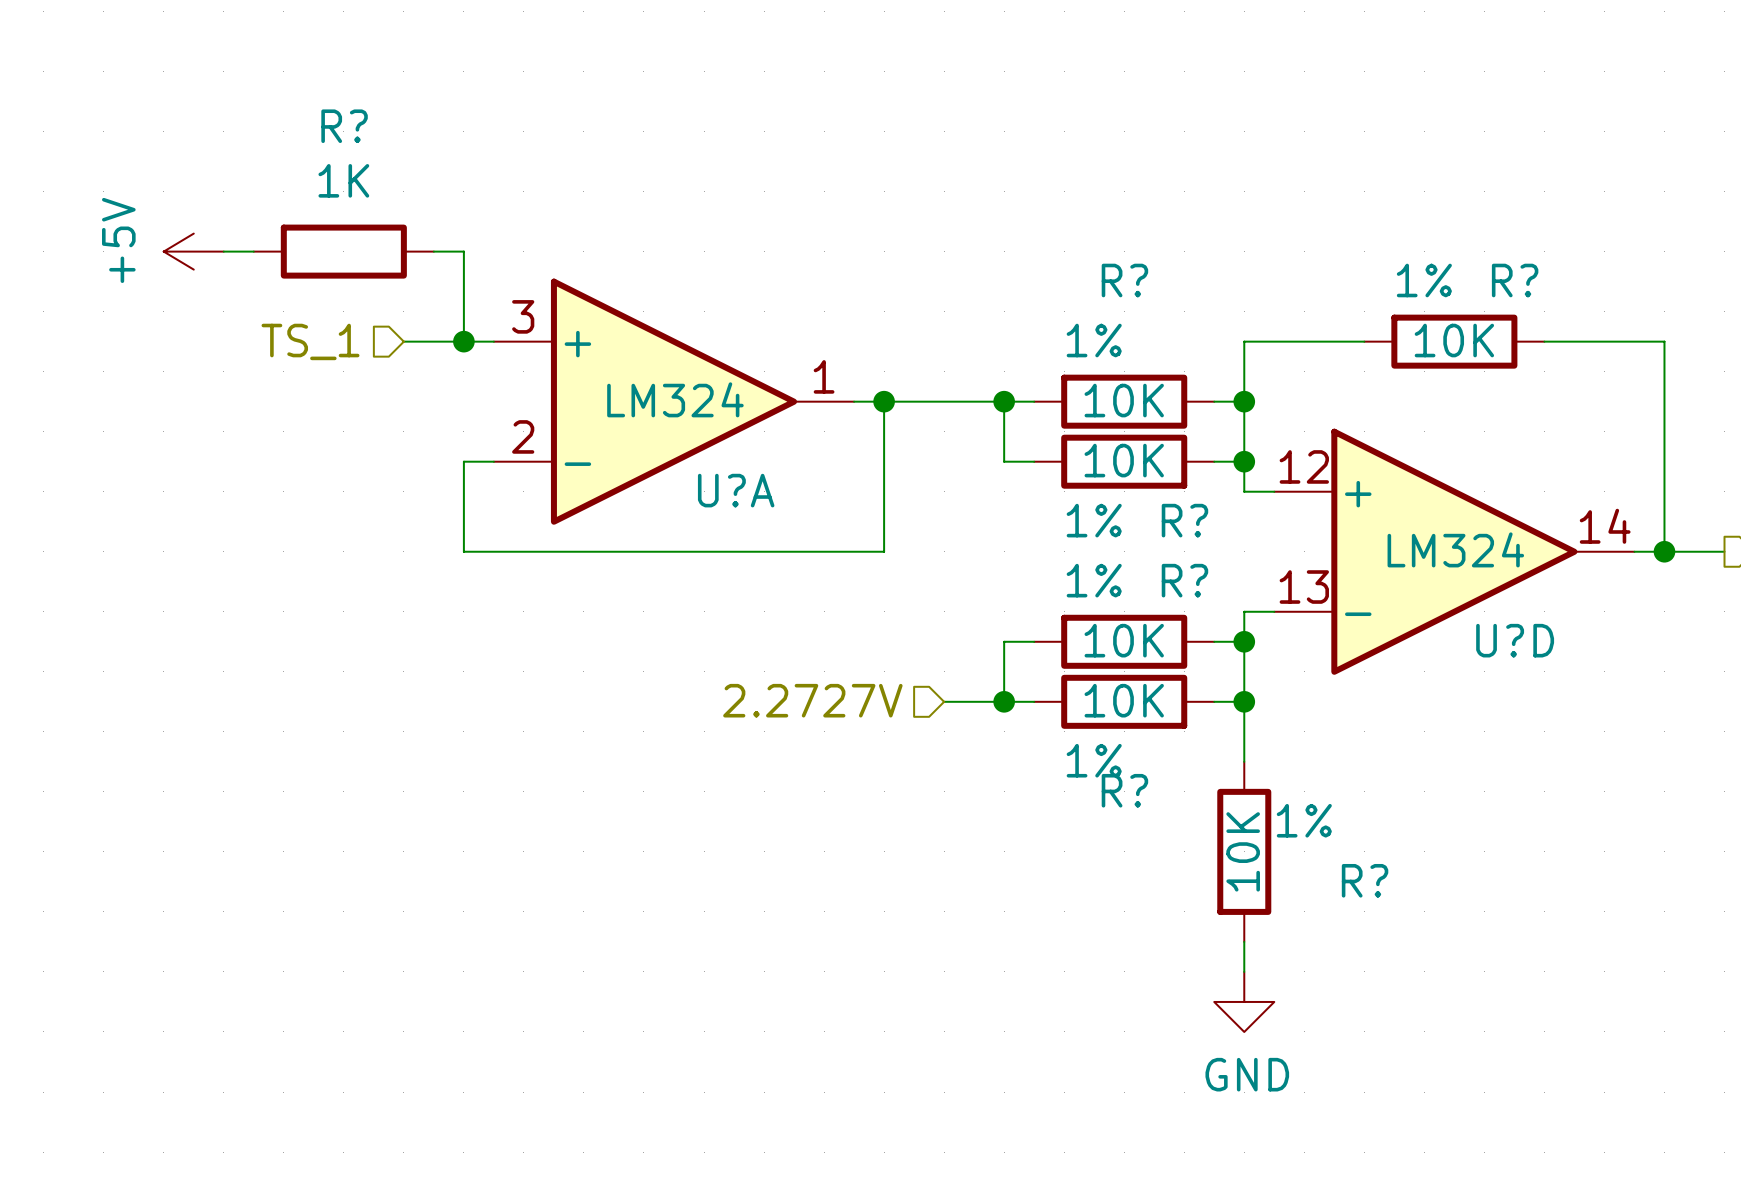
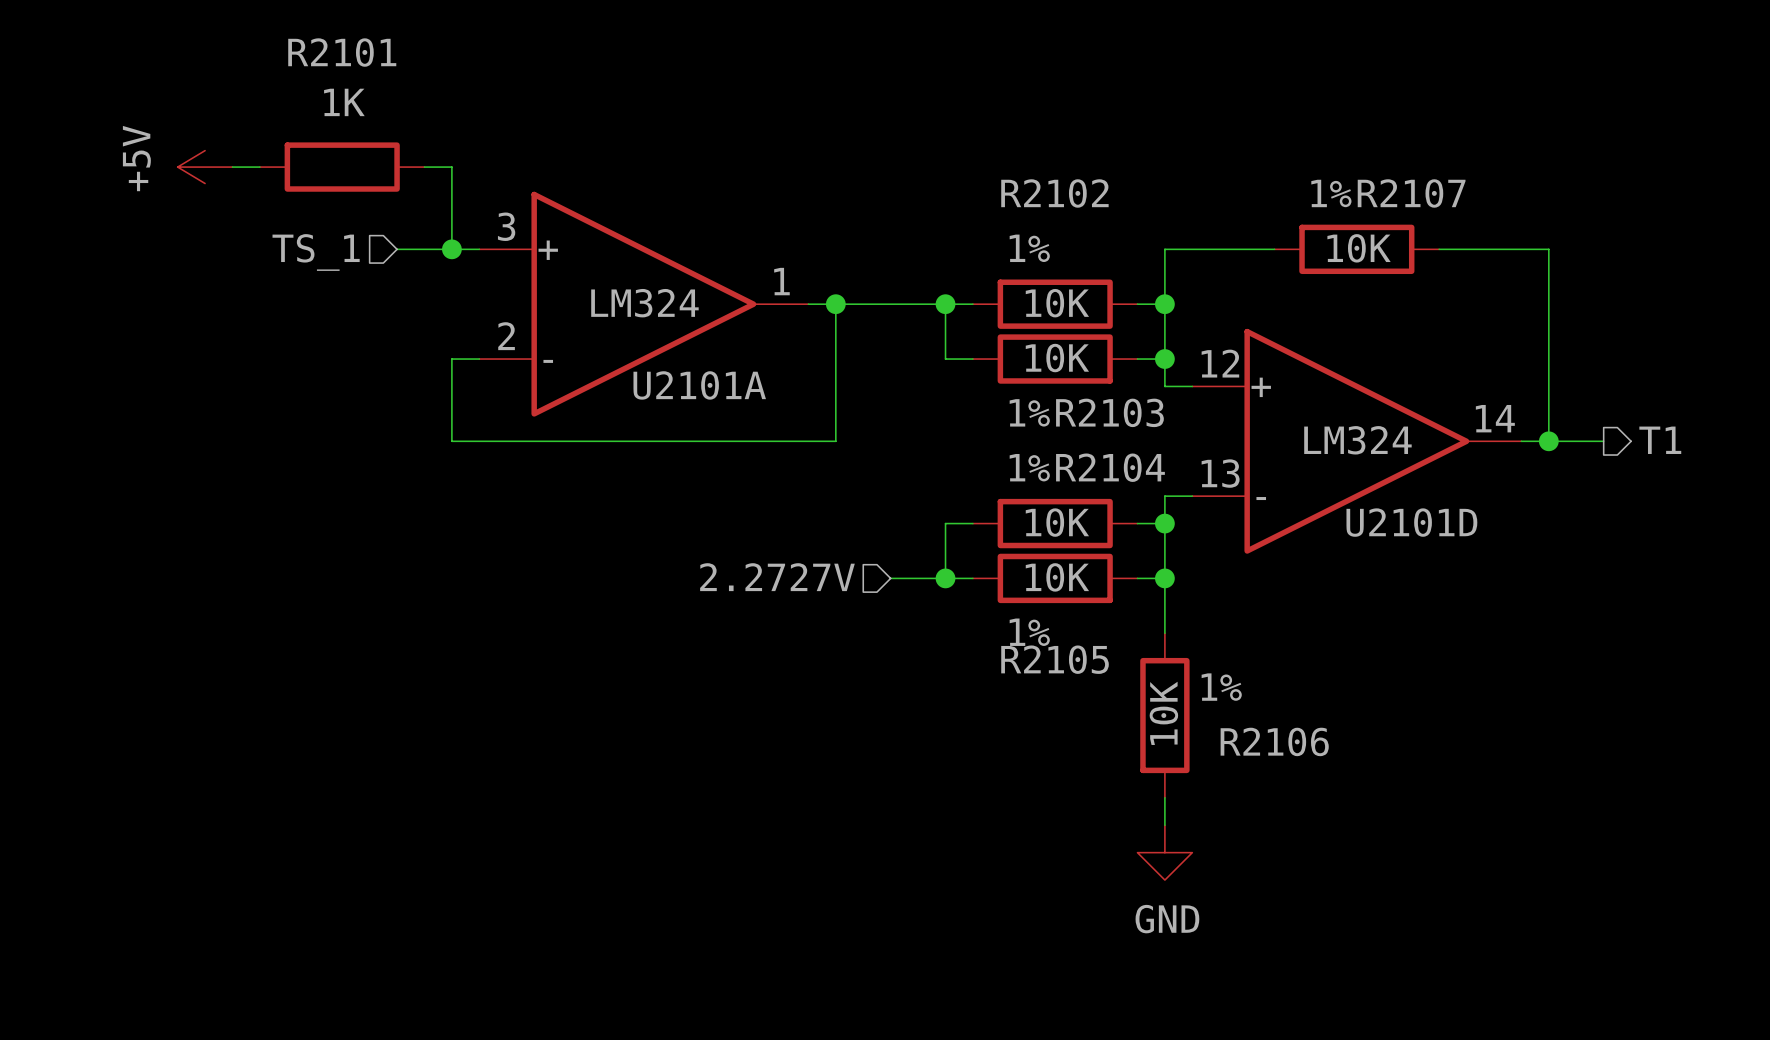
R? name: R? (344, 126) -> R2101 (342, 52)
R? name: R? (1124, 280) -> R2102 (1054, 193)
R? name: R? (1515, 280) -> R2107 (1411, 193)
U?A name: U?A (736, 490) -> U2101A (699, 385)
R? name: R? (1184, 520) -> R2103 (1109, 412)
R? name: R? (1184, 580) -> R2104 (1110, 467)
U?D name: U?D (1515, 640) -> U2101D (1411, 522)
R? name: R? (1124, 790) -> R2105 (1055, 659)
R? name: R? (1365, 880) -> R2106 (1274, 741)

